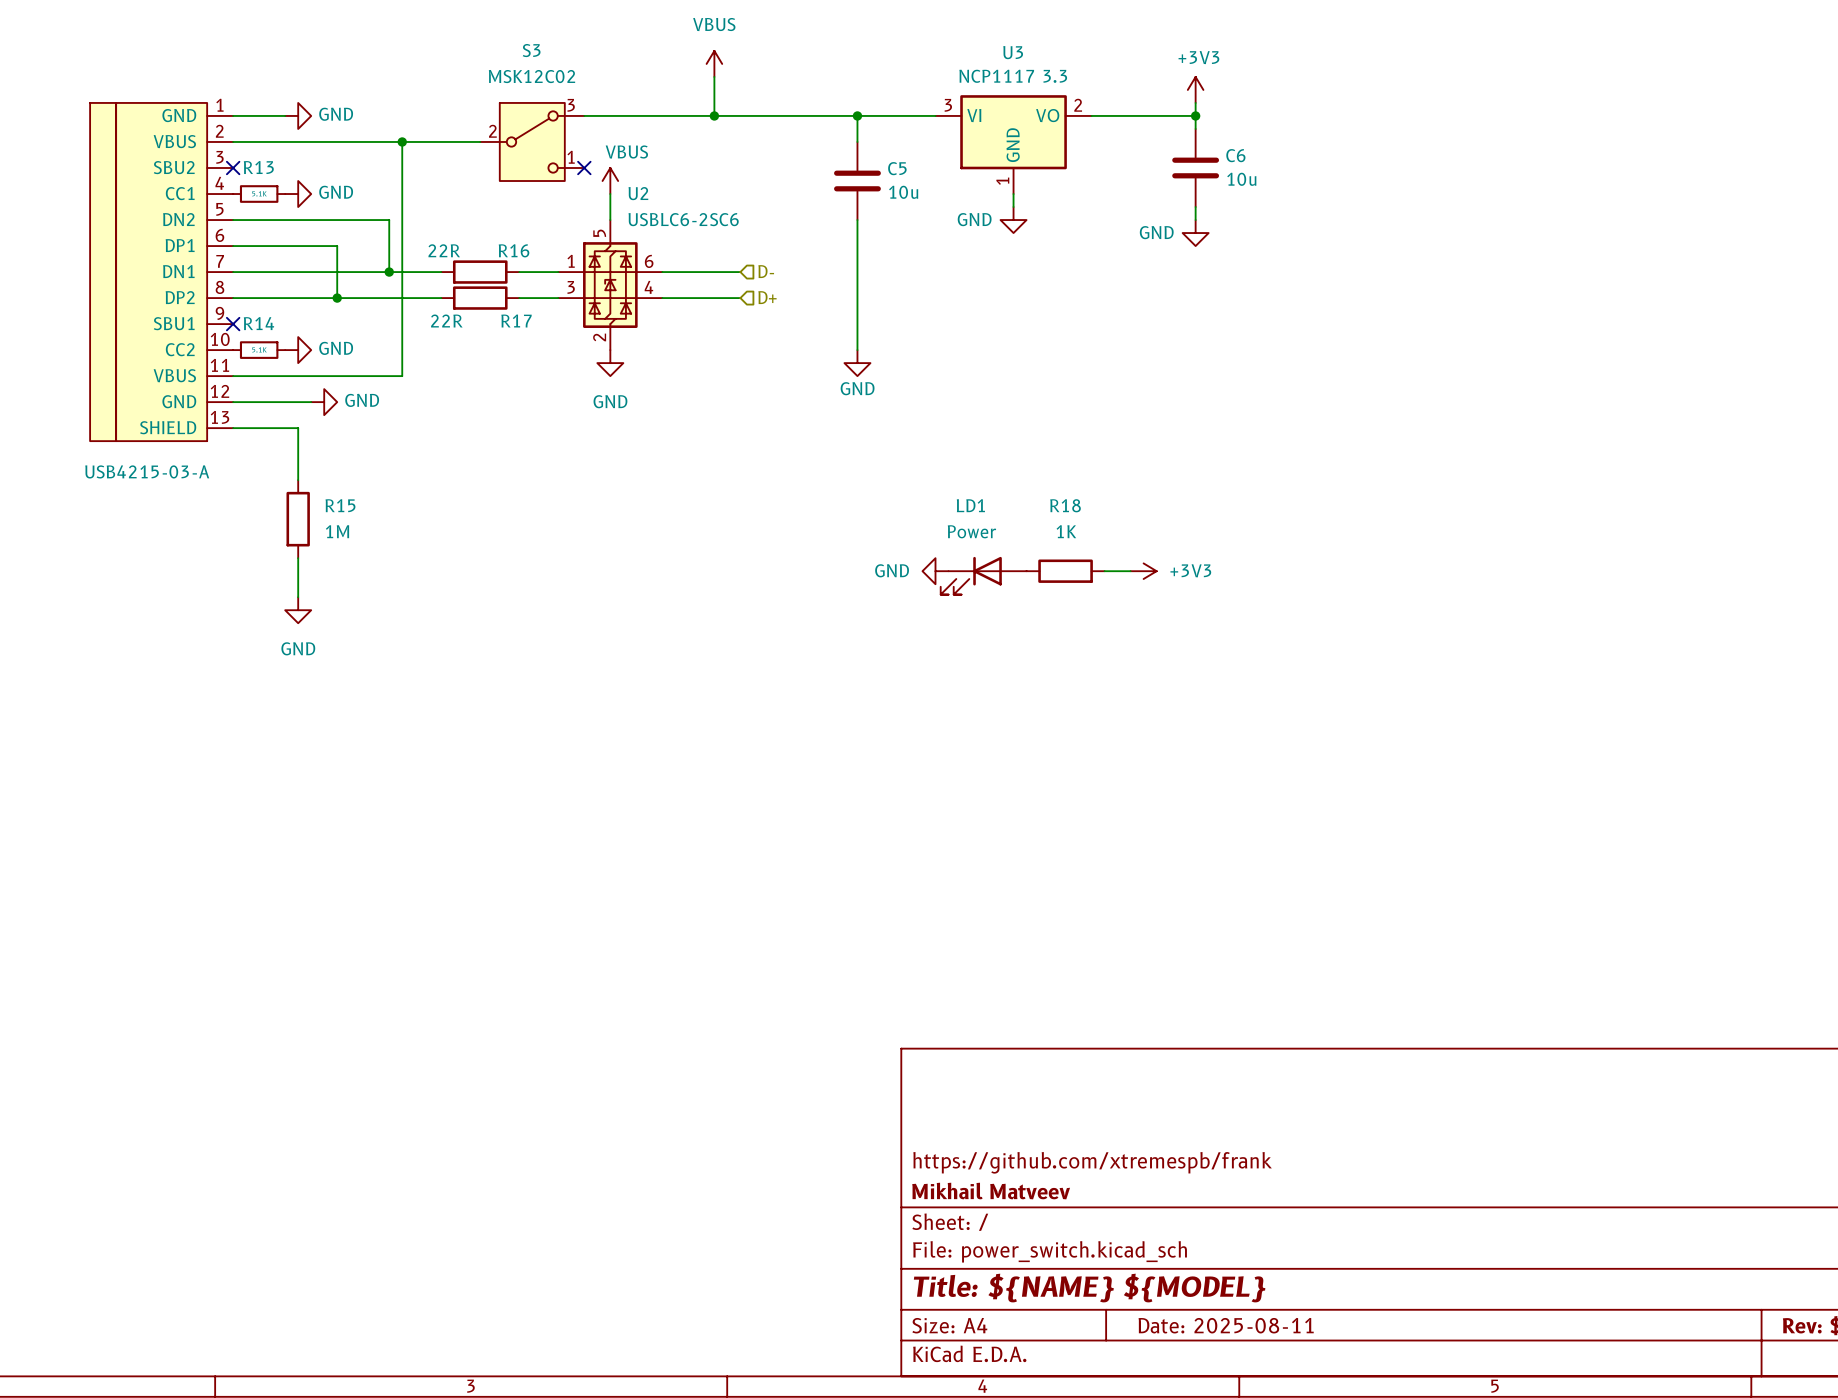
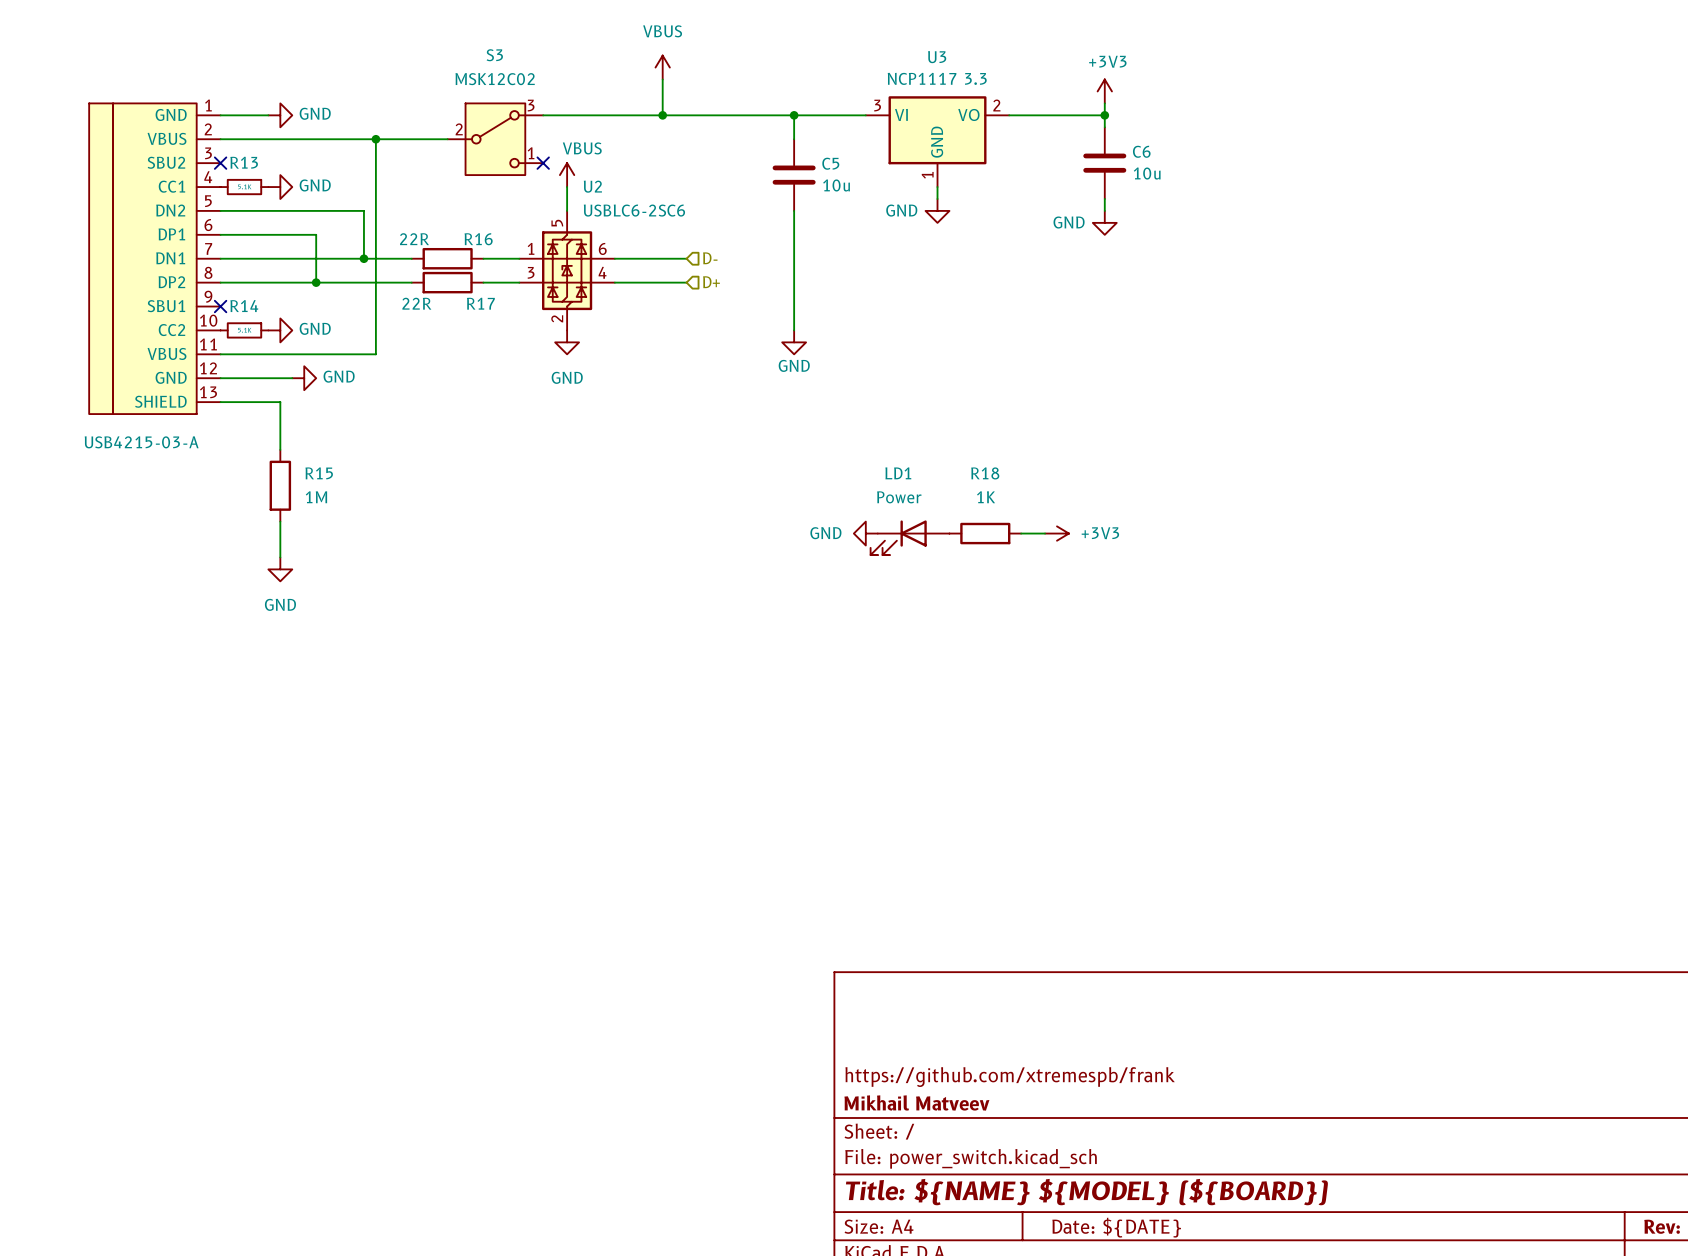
title block: Title: ${NAME} ${MODEL} (1089, 1288) -> Title: ${NAME} ${MODEL} (${BOARD}) (1086, 1192)
title block: Date: 2025-08-11 (1226, 1325) -> Date: ${DATE} (1116, 1227)

